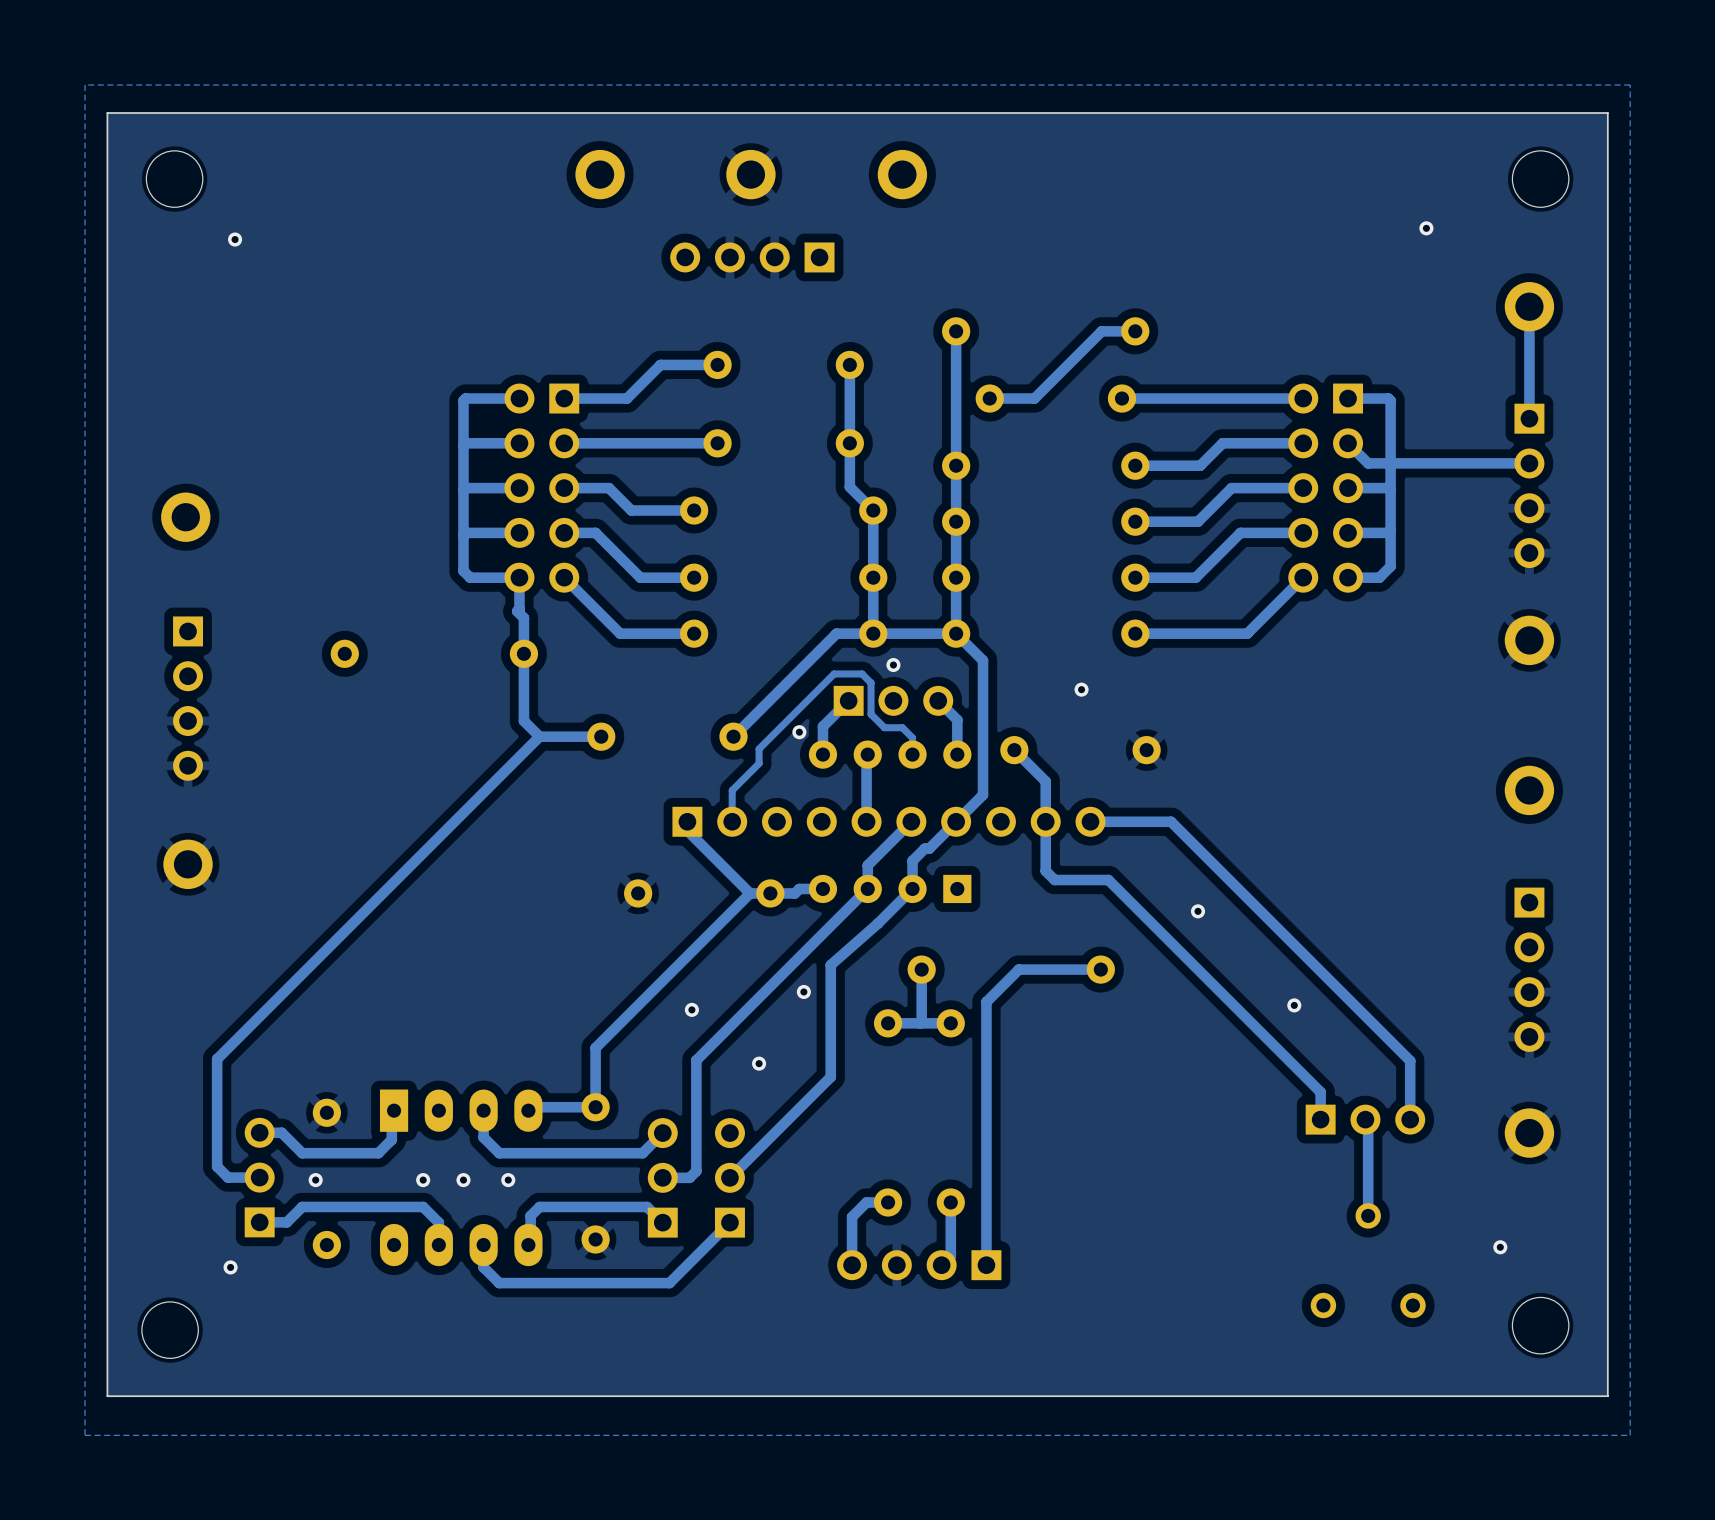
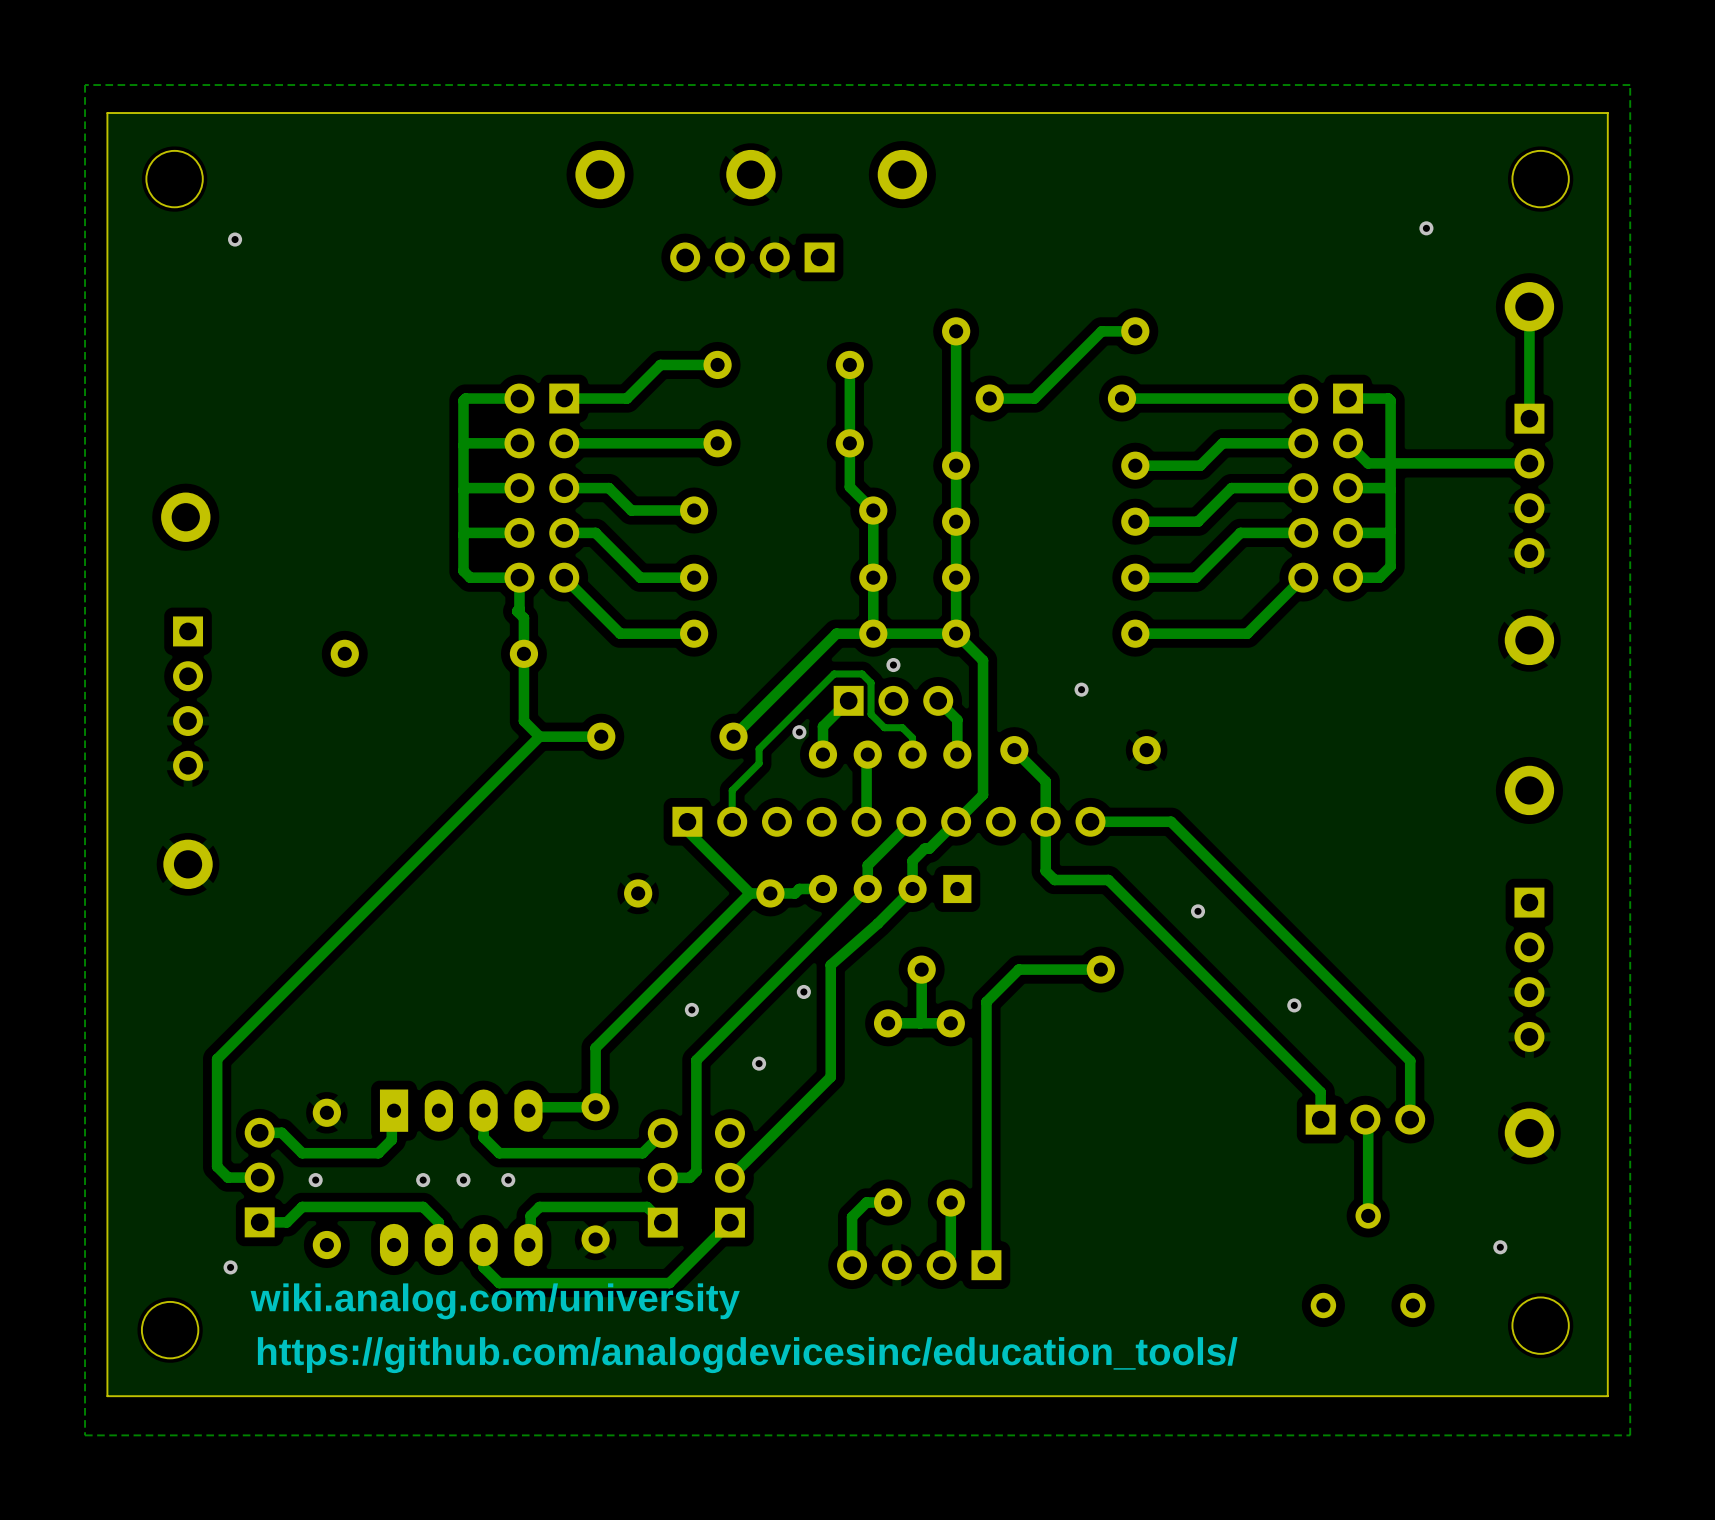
text: none -> wiki.analog.com/university (495, 1301)
text: none -> https://github.com/analogdevicesinc/education_tools/ (747, 1355)

